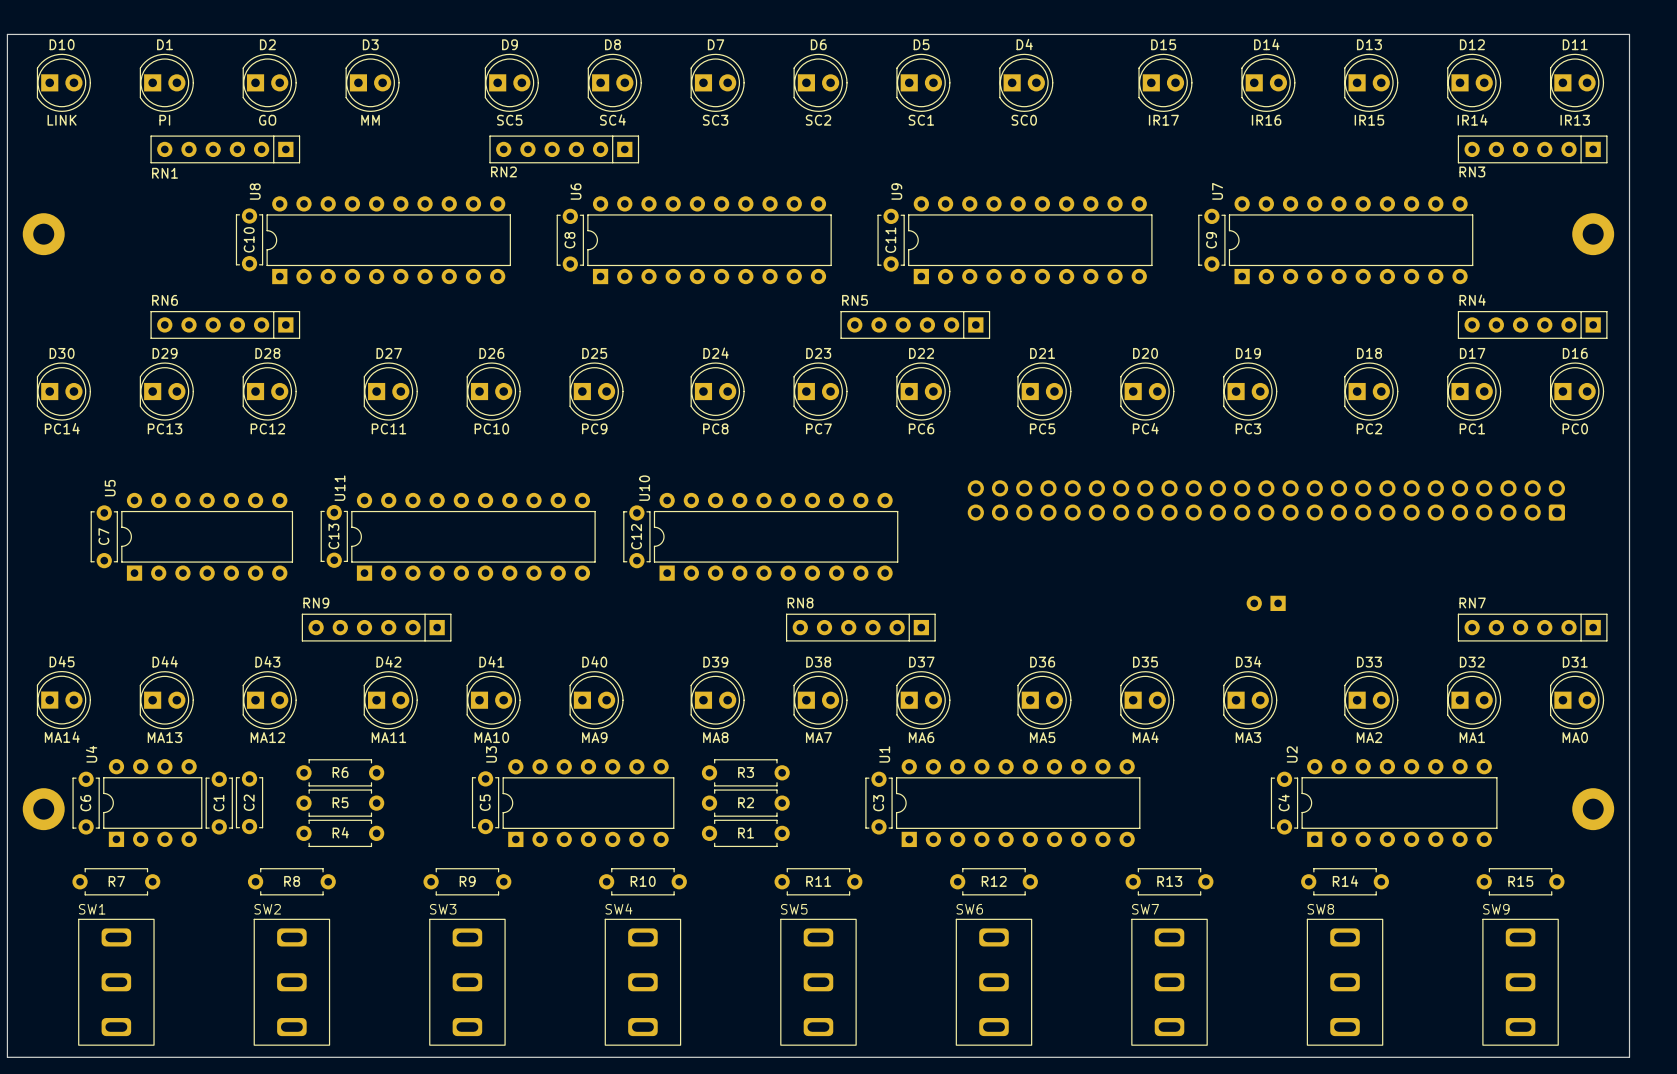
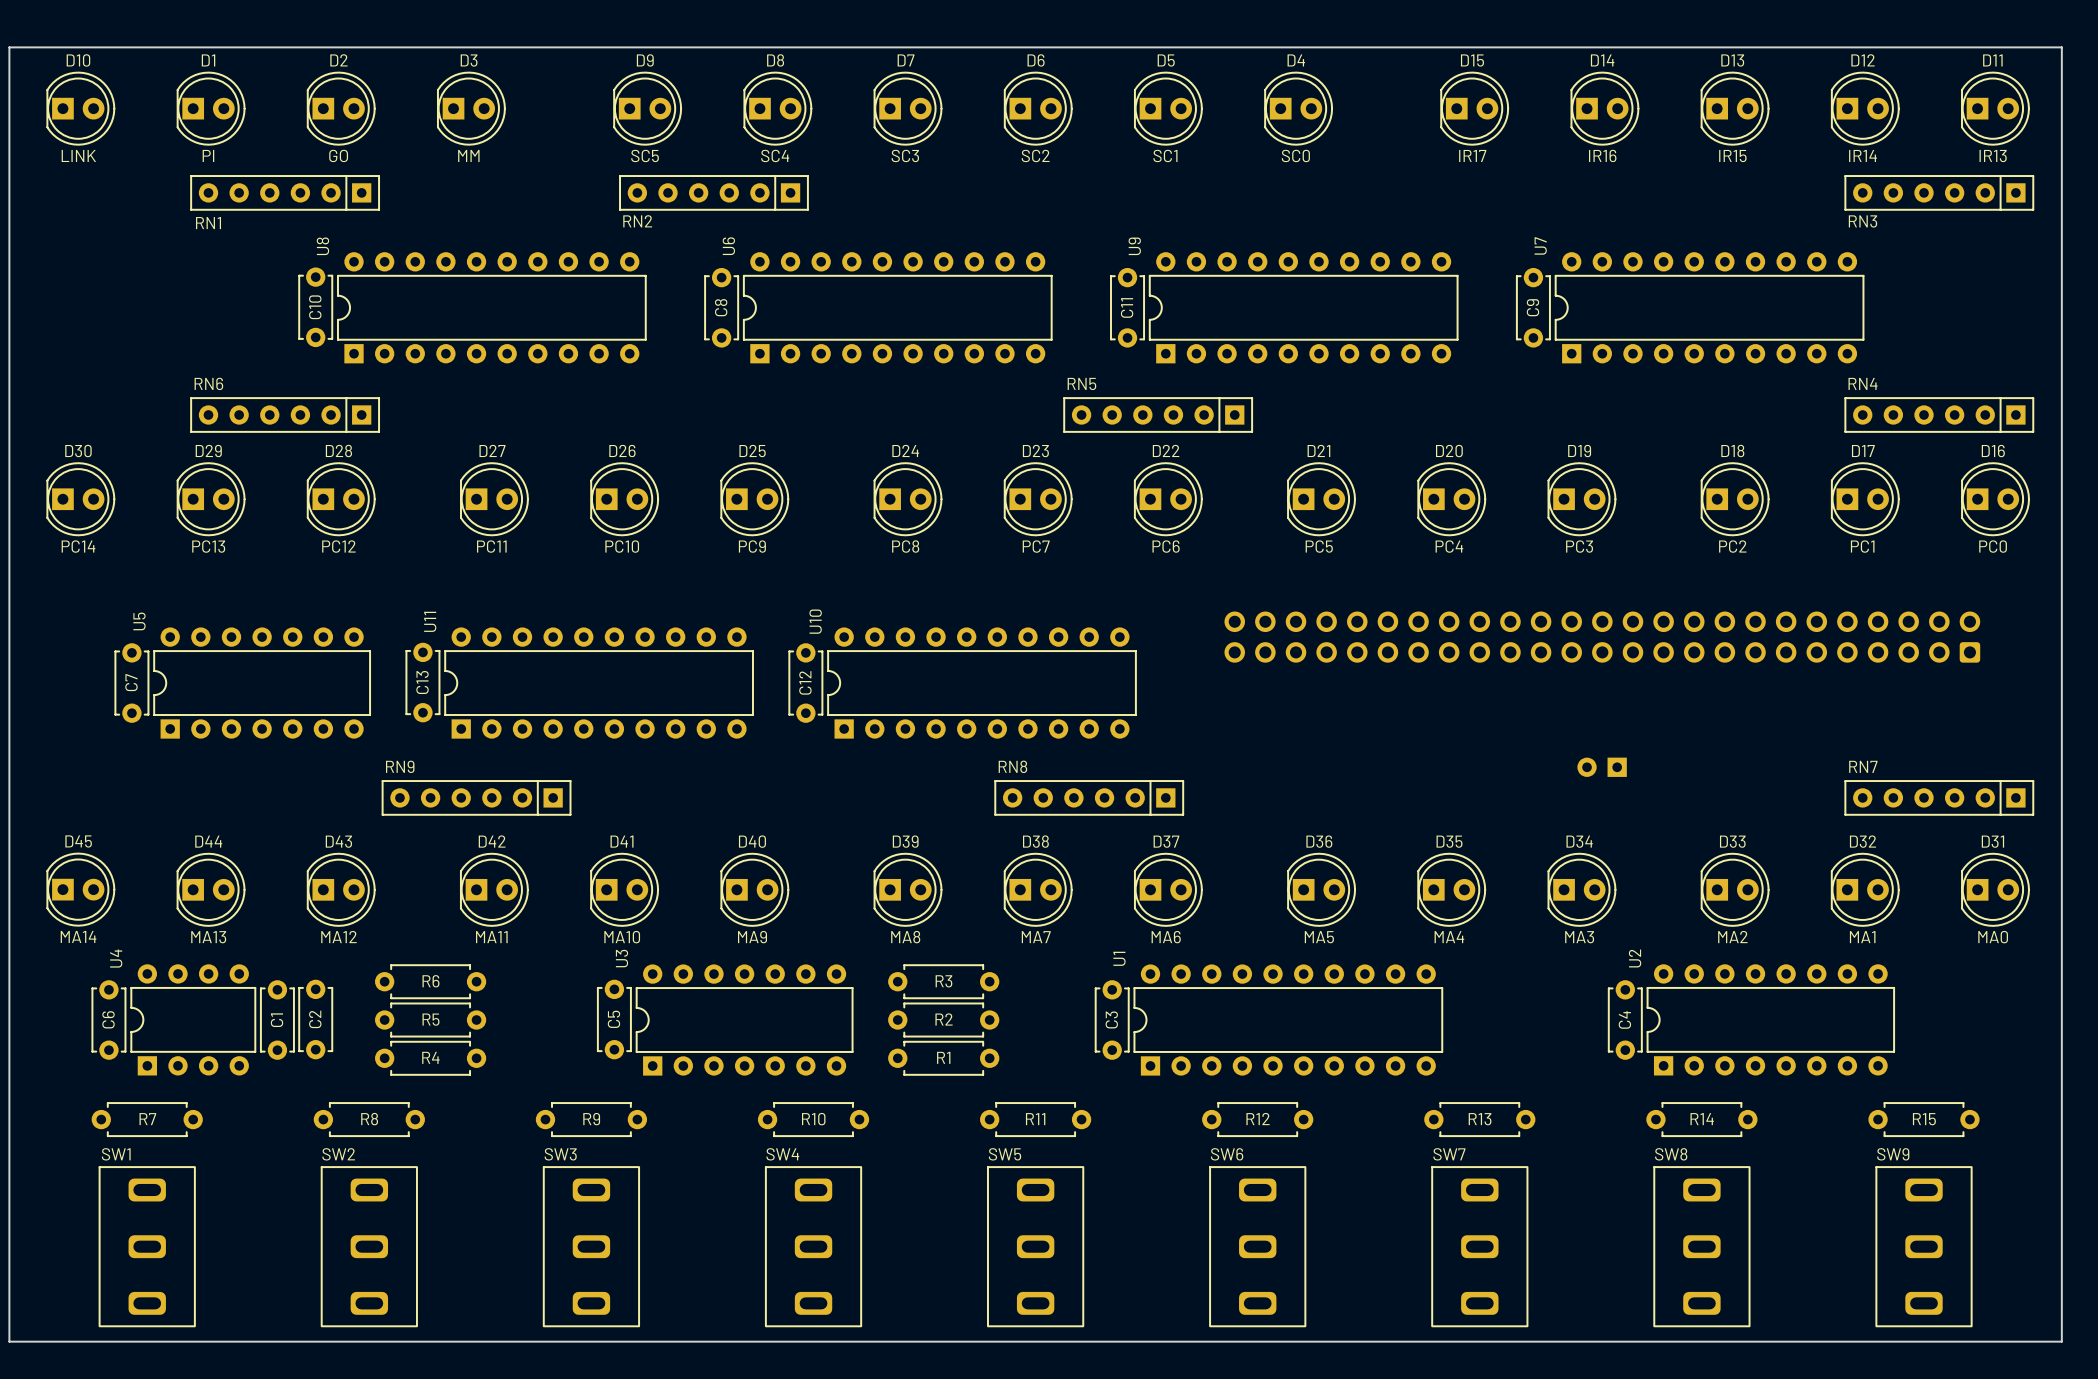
part: (43, 234) -> none
part: (1593, 234) -> none
part: (43, 809) -> none
part: (1593, 809) -> none

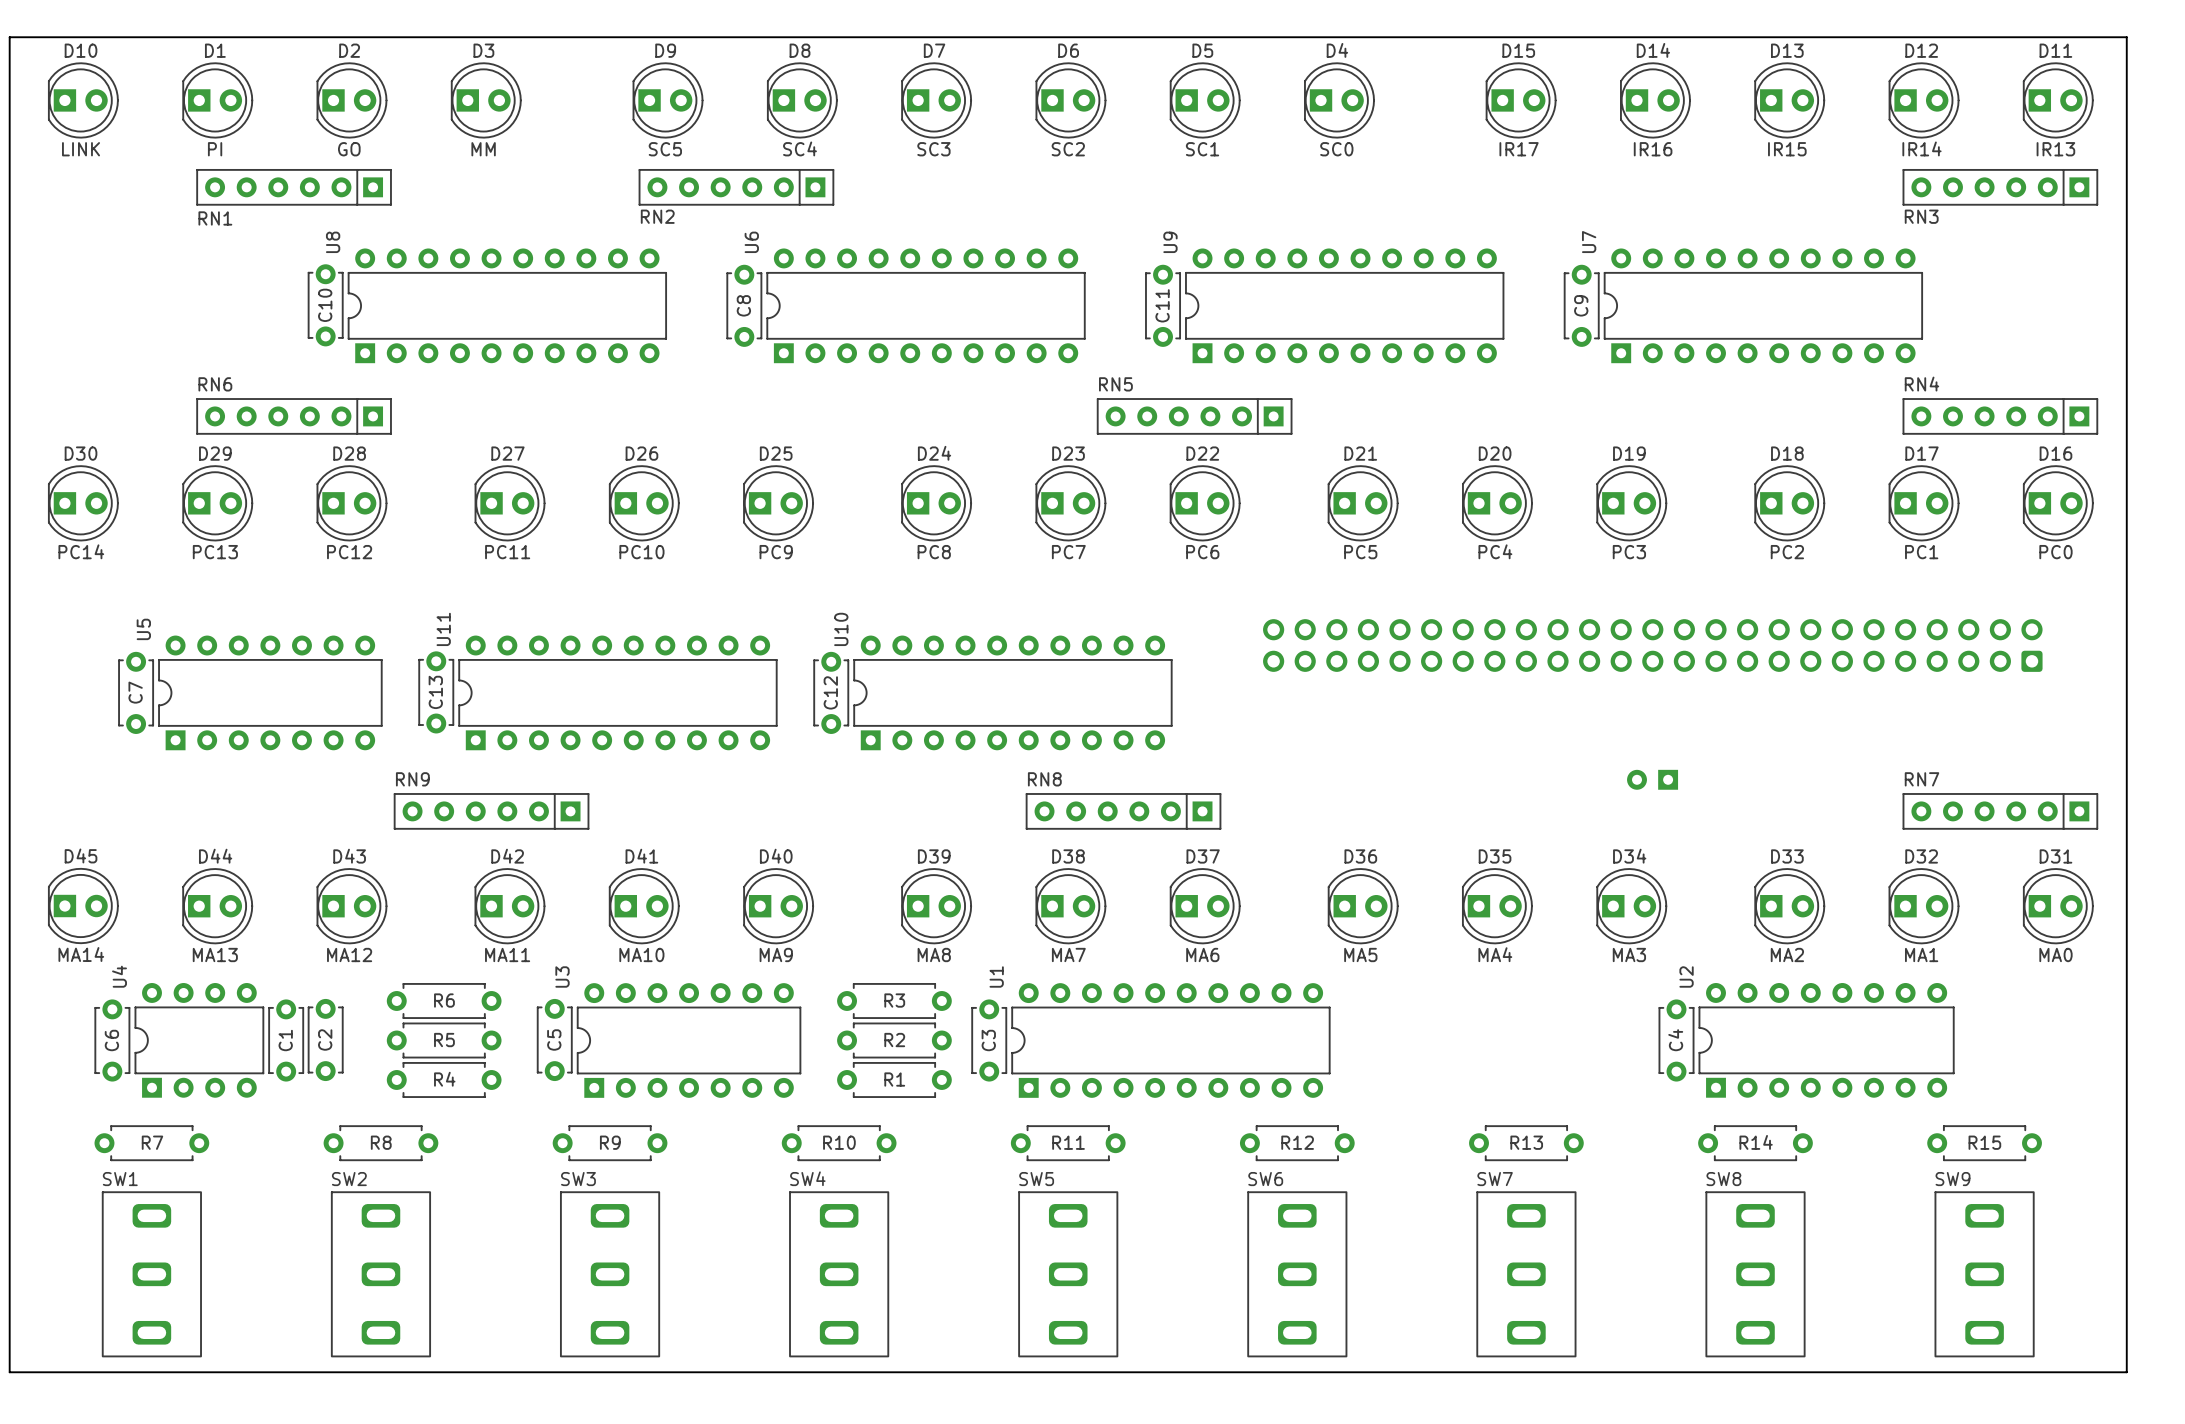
R3 position: (943, 981) -> (894, 1000)
C5 position: (614, 1019) -> (554, 1039)
U3 position: (744, 1020) -> (689, 1040)
R2 position: (943, 1020) -> (894, 1040)
C3 position: (1112, 1020) -> (989, 1040)
U1 position: (1288, 1020) -> (1170, 1040)
R1 position: (943, 1058) -> (894, 1079)

